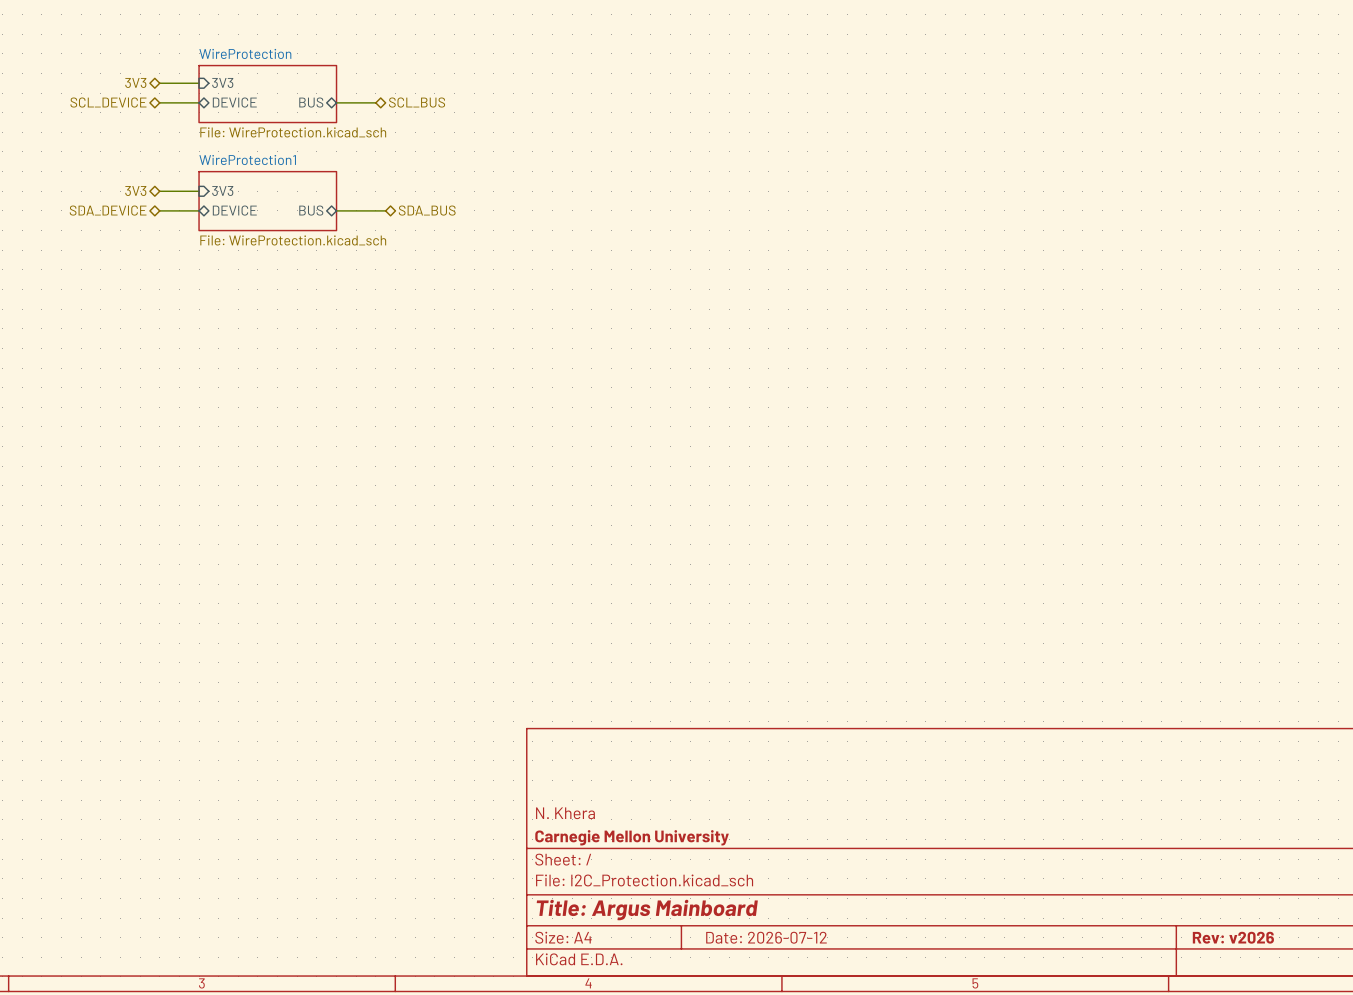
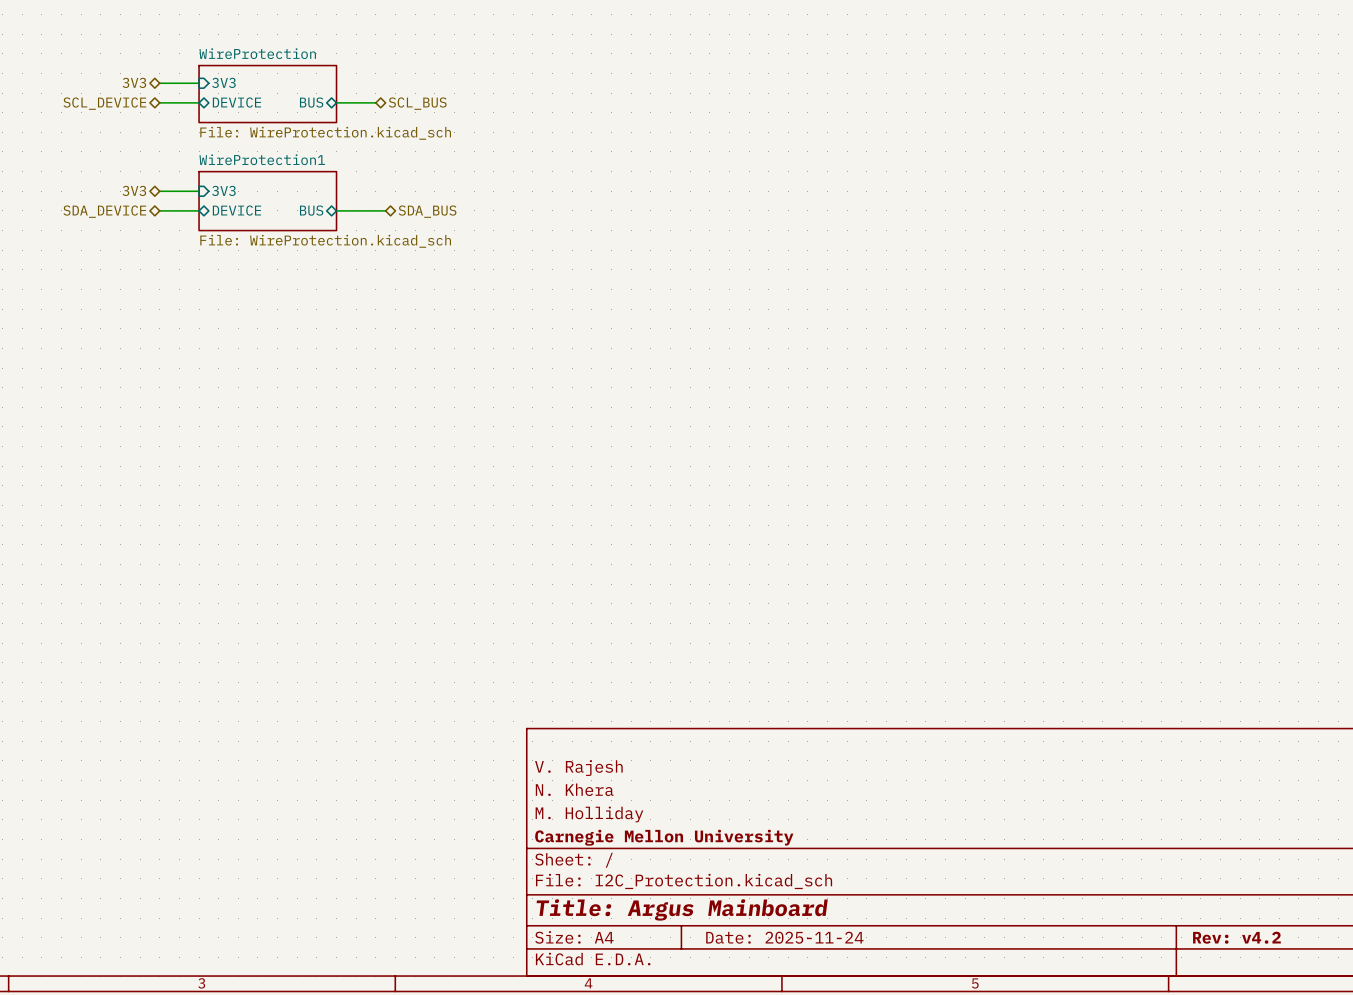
title block: none -> V. Rajesh (578, 768)
title block: none -> N. Khera (574, 789)
title block: N. Khera (565, 813) -> M. Holliday (589, 814)
title block: Date: 2026-07-12 (766, 937) -> Date: 2025-11-24 (784, 937)
title block: Rev: v2026 (1233, 937) -> Rev: v4.2 (1236, 937)

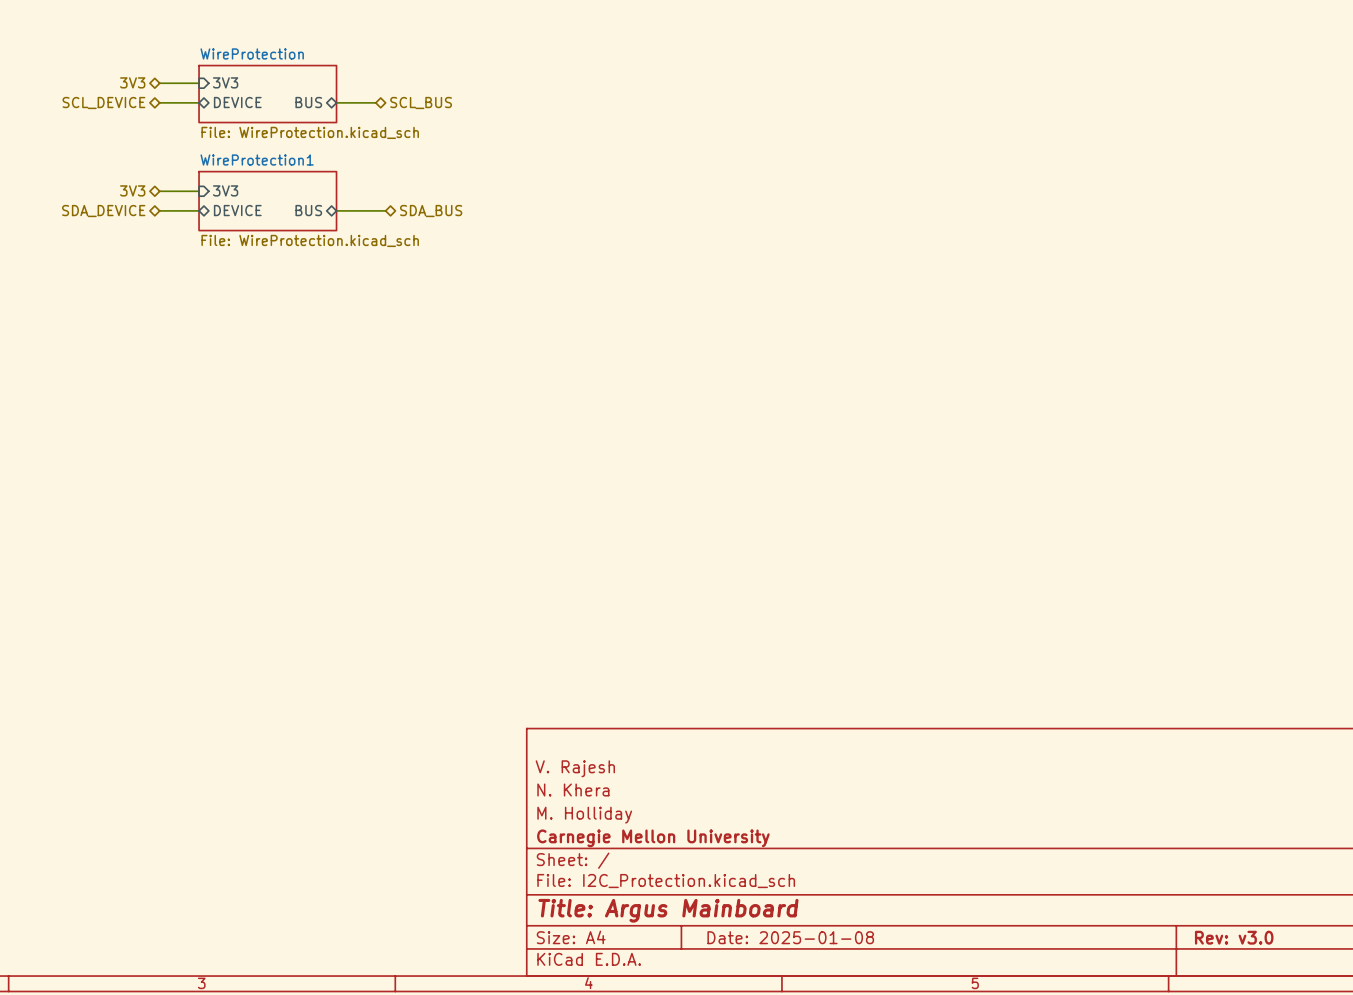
title block: Date: 2025-11-24 (784, 937) -> Date: 2025-01-08 (790, 937)
title block: Rev: v4.2 (1236, 937) -> Rev: v3.0 (1234, 937)

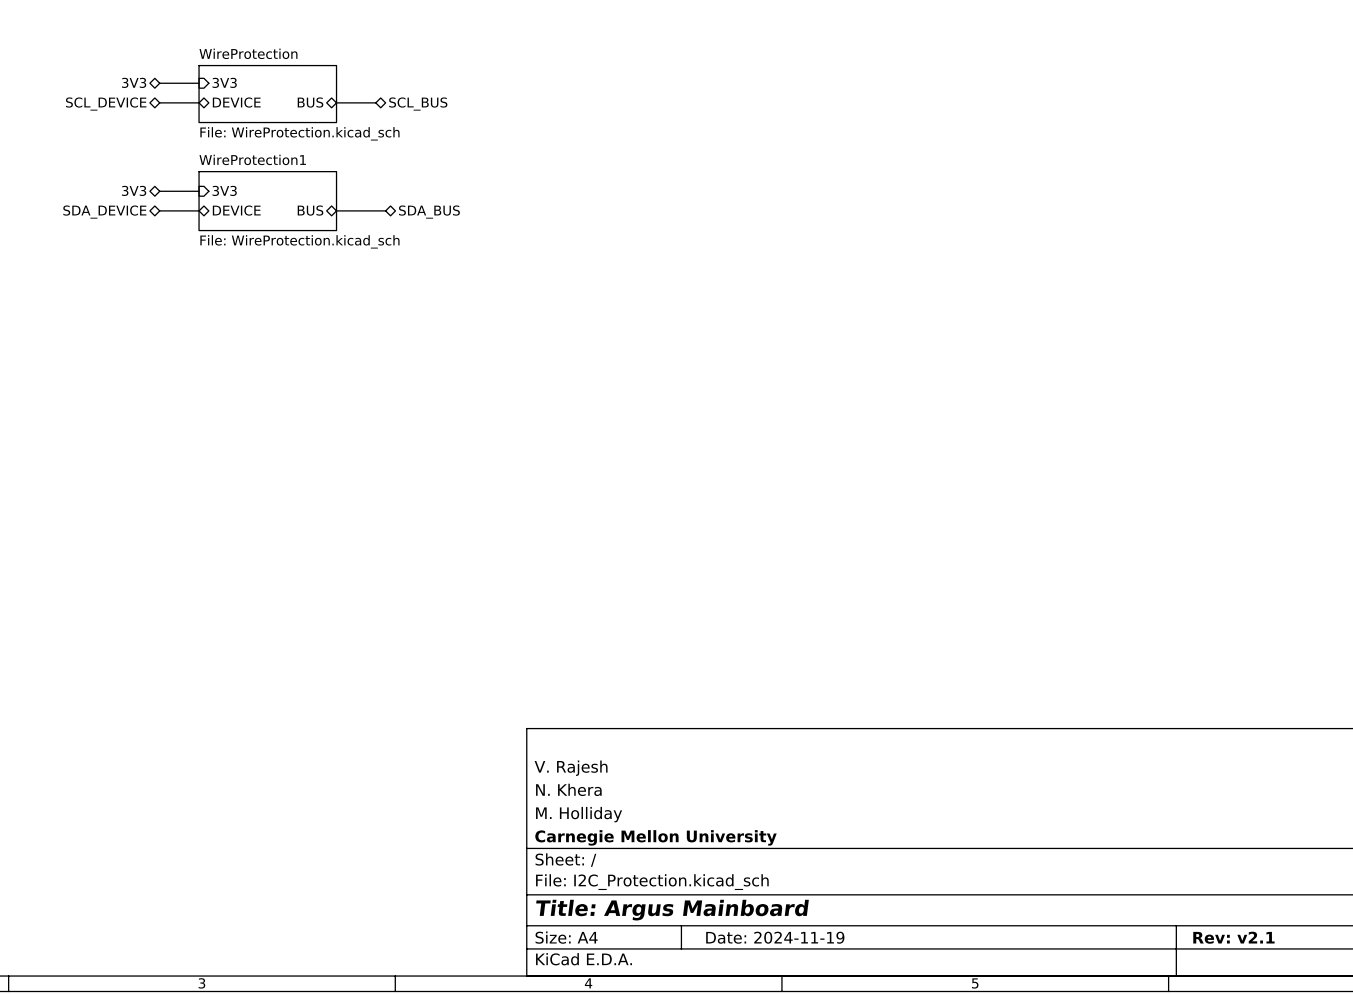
title block: Date: 2025-01-08 (790, 937) -> Date: 2024-11-19 (775, 937)
title block: Rev: v3.0 (1234, 937) -> Rev: v2.1 (1233, 937)

